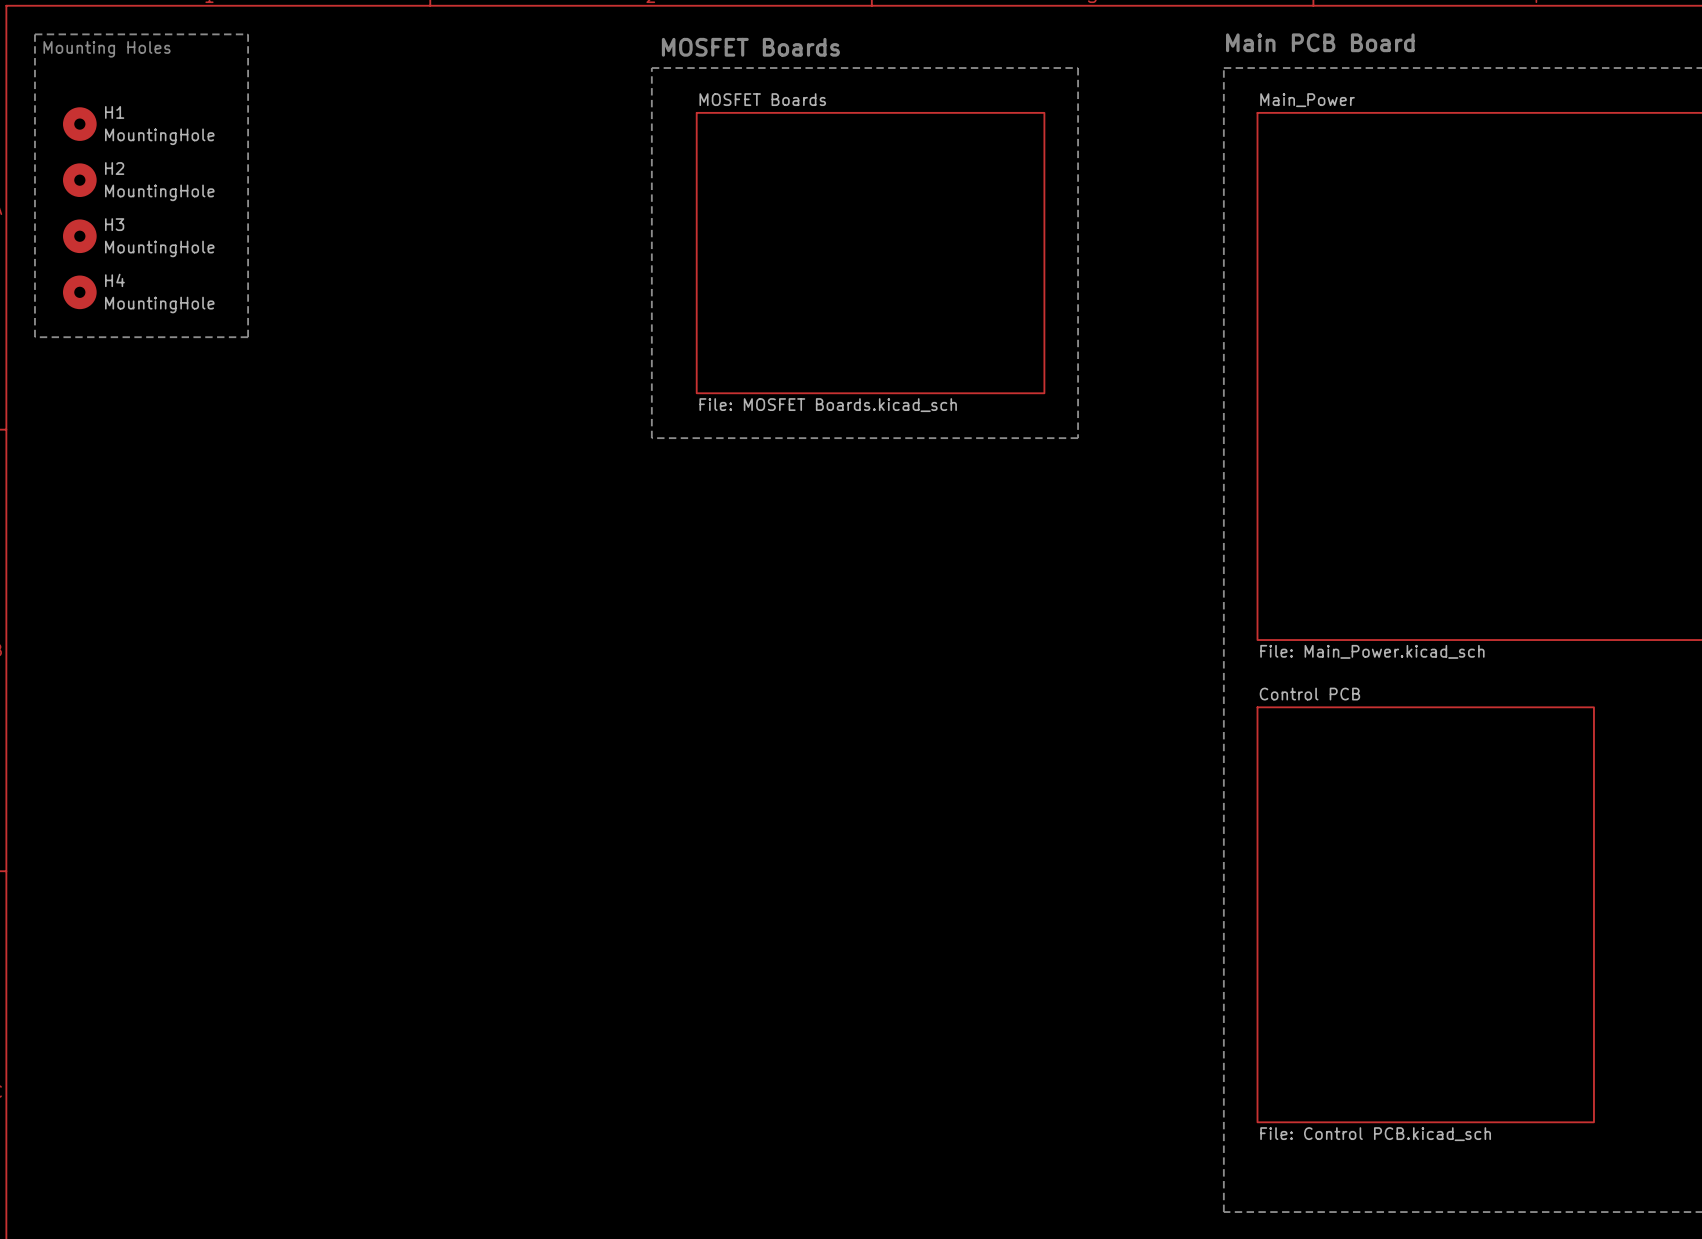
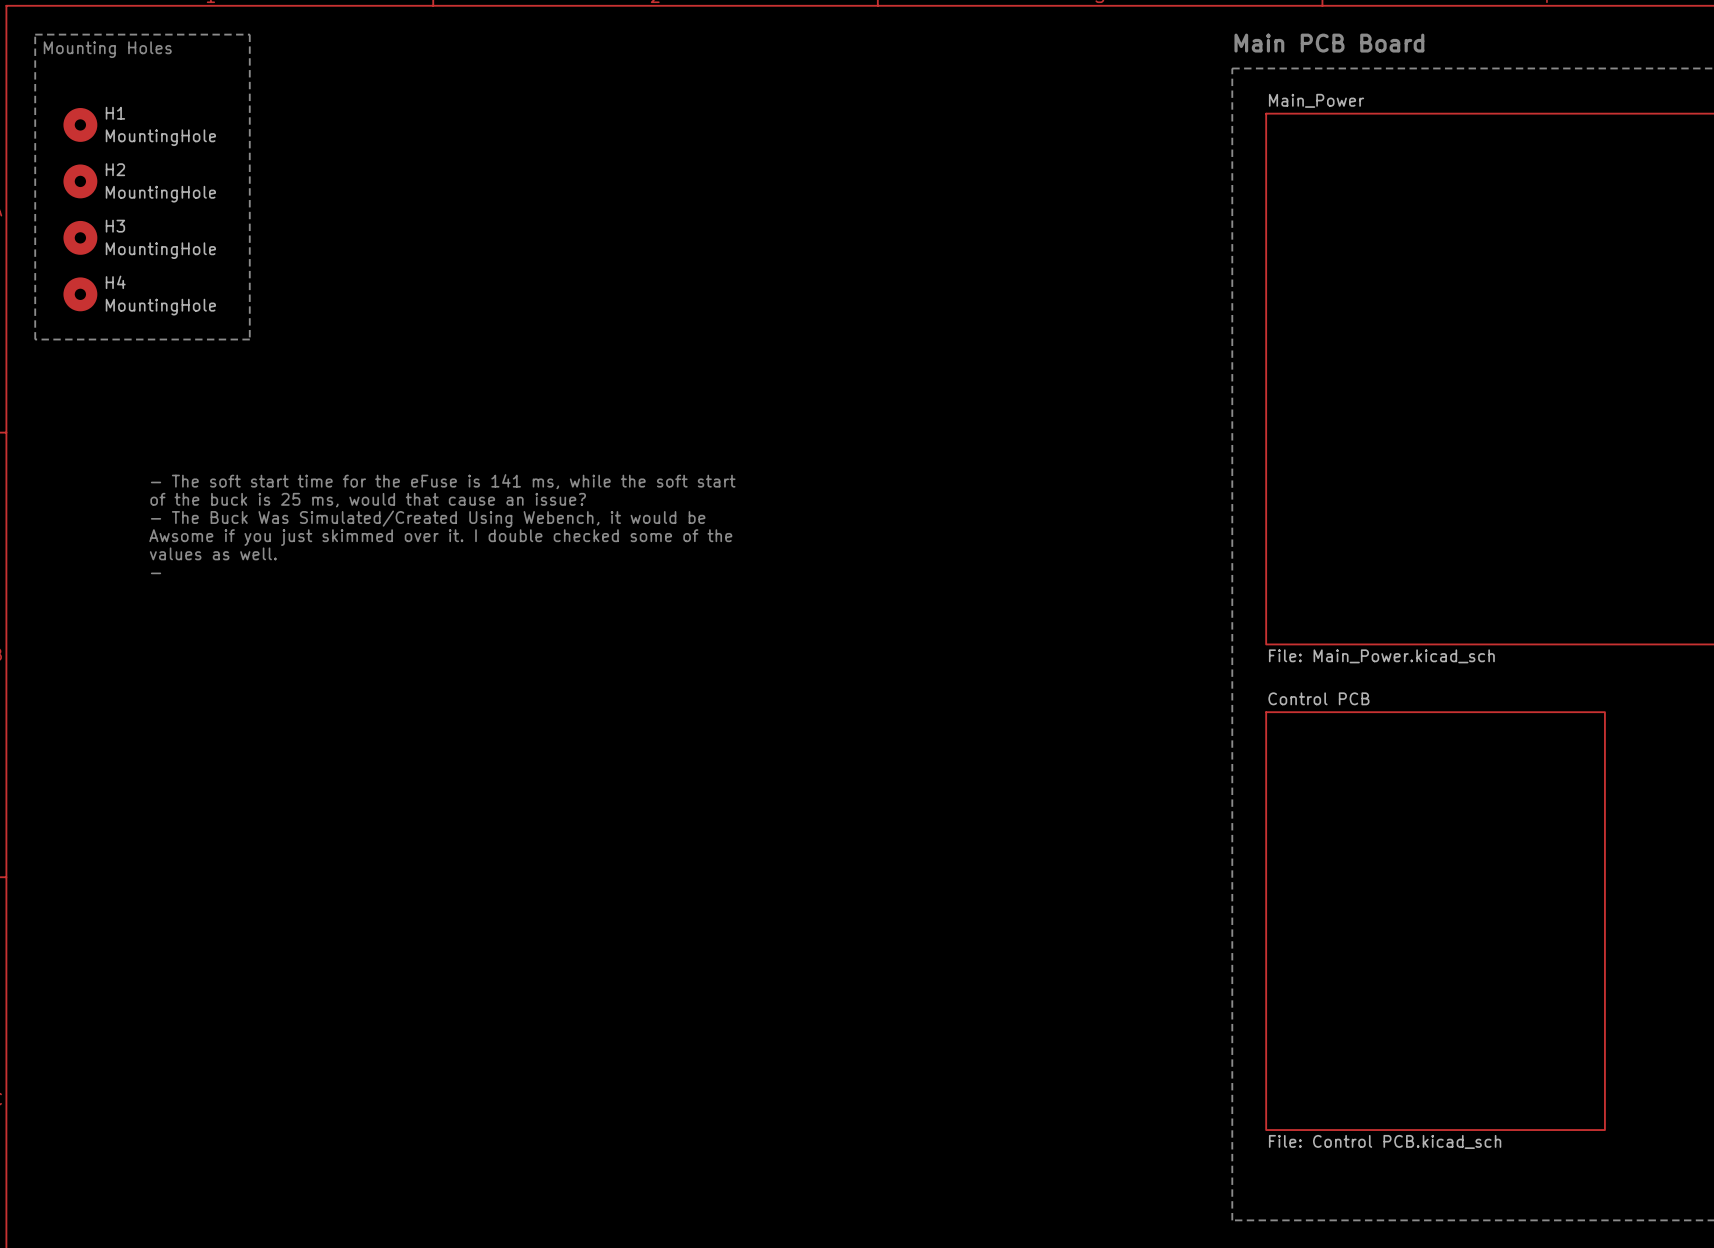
text: MOSFET Boards (750, 47) -> none
line: (651, 68) (1078, 68) (1078, 438) (651, 438) (651, 68) -> none
sheet MOSFET Boards: File: MOSFET Boards.kicad_sch (870, 253) -> none
text: none -> - The soft start time for the eFuse is 141 ms, while the soft start (443, 481)
text: none -> of the buck is 25 ms, would that cause an issue? (368, 500)
text: none -> - The Buck Was Simulated/Created Using Webench, it would be (428, 519)
text: none -> Awsome if you just skimmed over it. I double checked some of the (440, 537)
text: none -> values as well. (213, 553)
text: none -> - (156, 573)

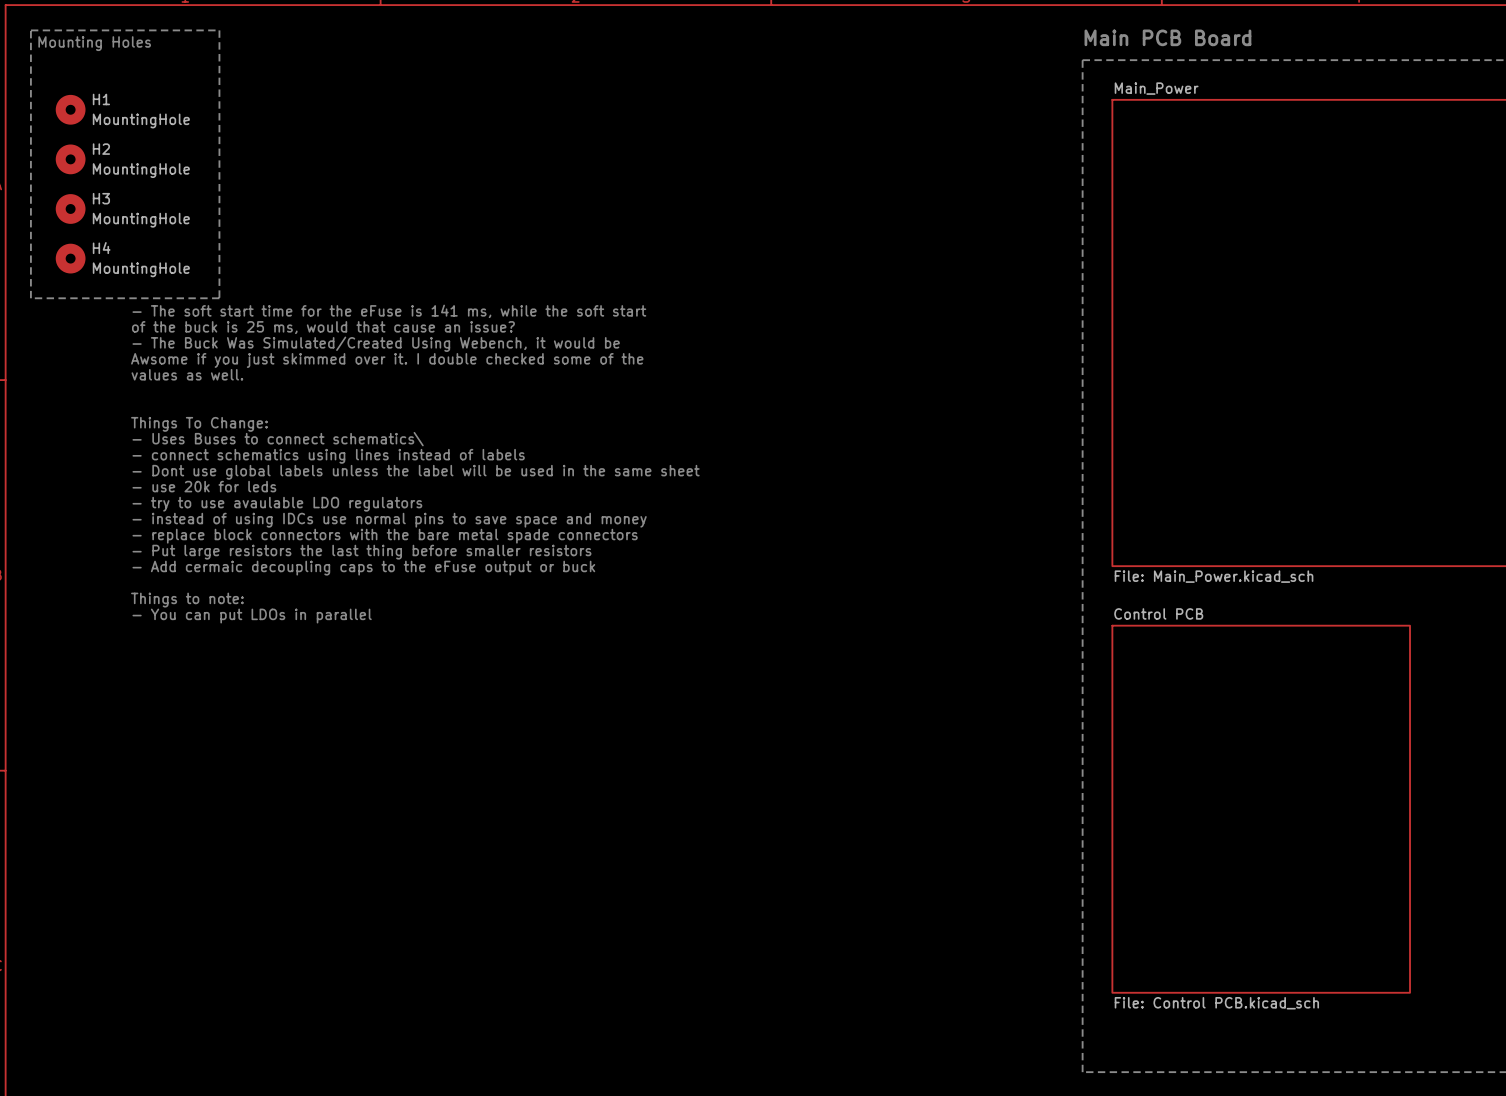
text: none -> - The soft start time for the eFuse is 141 ms, while the soft start (389, 311)
text: none -> of the buck is 25 ms, would that cause an issue? (323, 327)
text: none -> - The Buck Was Simulated/Created Using Webench, it would be (376, 344)
text: none -> Awsome if you just skimmed over it. I double checked some of the (387, 360)
text: none -> values as well. (187, 374)
text: - The soft start time for the eFuse is 141 ms, while the soft start (443, 481) -> Things To Change: (199, 424)
text: of the buck is 25 ms, would that cause an issue? (368, 500) -> - Uses Buses to connect schematics\ (278, 439)
text: - The Buck Was Simulated/Created Using Webench, it would be (428, 519) -> - connect schematics using lines instead of labels (328, 456)
text: Awsome if you just skimmed over it. I double checked some of the (440, 537) -> - Dont use global labels unless the label will be used in the same sheet (416, 472)
text: values as well. (213, 553) -> - use 20k for leds (204, 486)
text: - (156, 573) -> - try to use avaulable LDO regulators (277, 504)
text: none -> - instead of using IDCs use normal pins to save space and money (389, 520)
text: none -> - replace block connectors with the bare metal spade connectors (385, 536)
text: none -> - Put large resistors the last thing before smaller resistors (361, 552)
text: none -> - Add cermaic decoupling caps to the eFuse output or buck (363, 568)
text: none -> Things to note: (187, 600)
text: none -> - You can put LDOs in parallel (252, 616)

